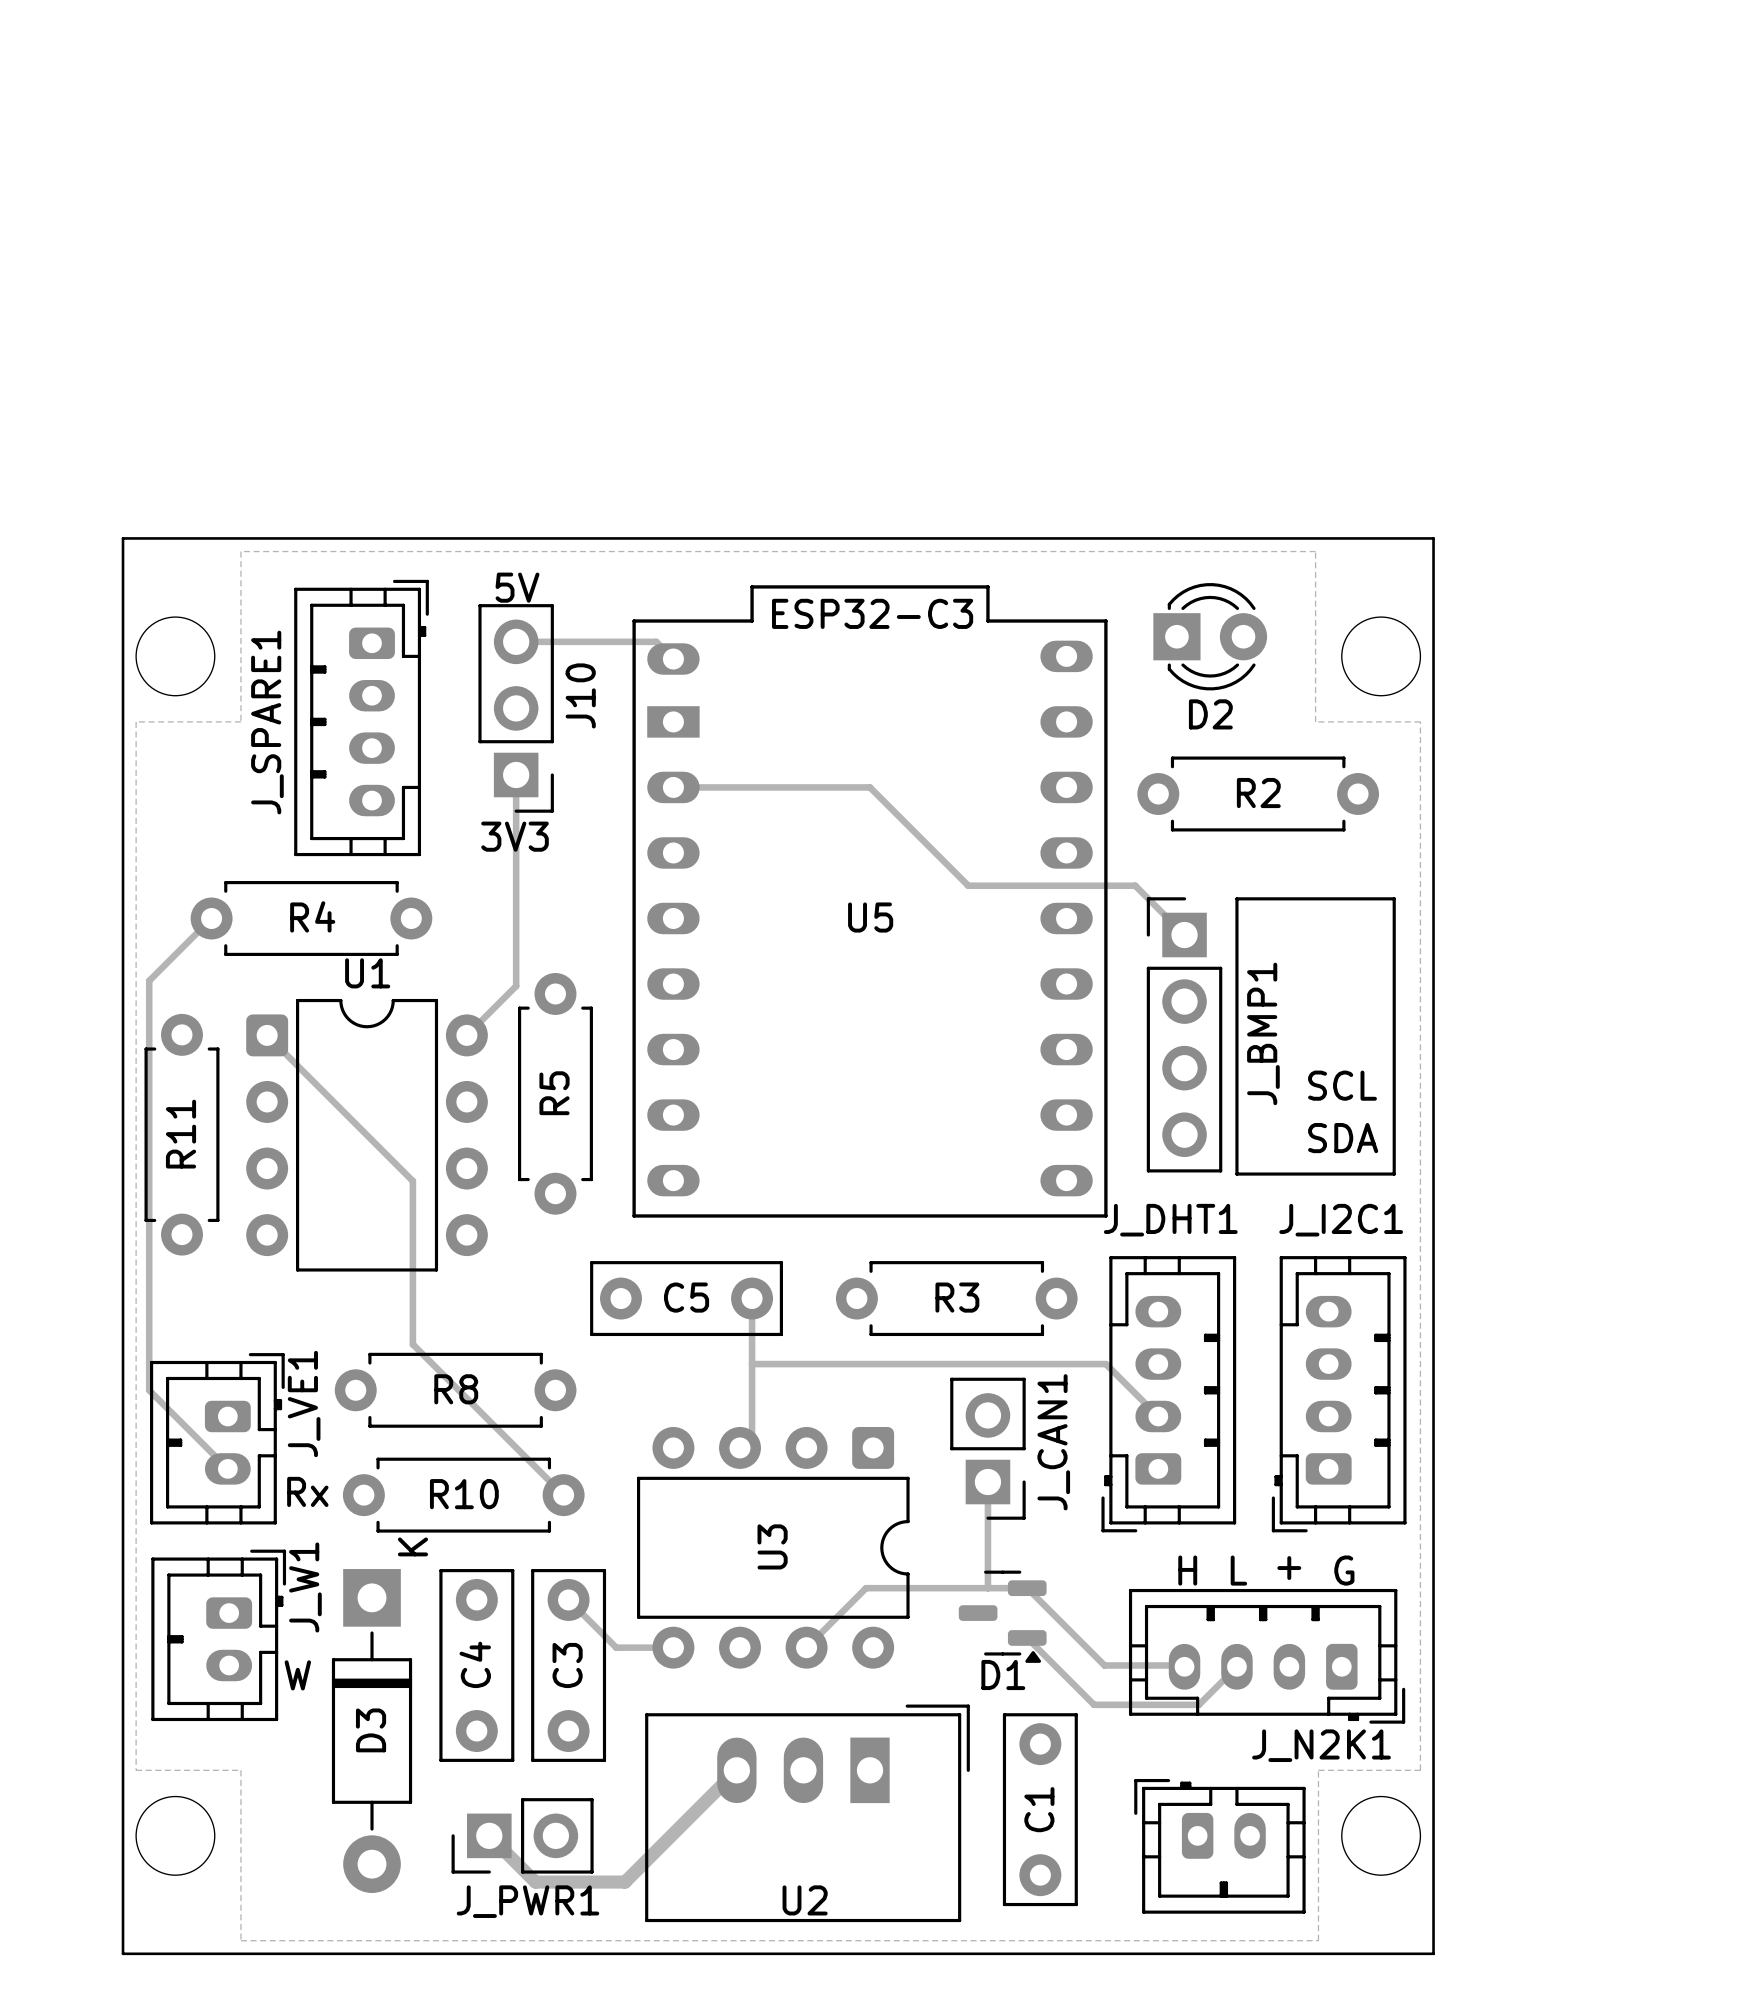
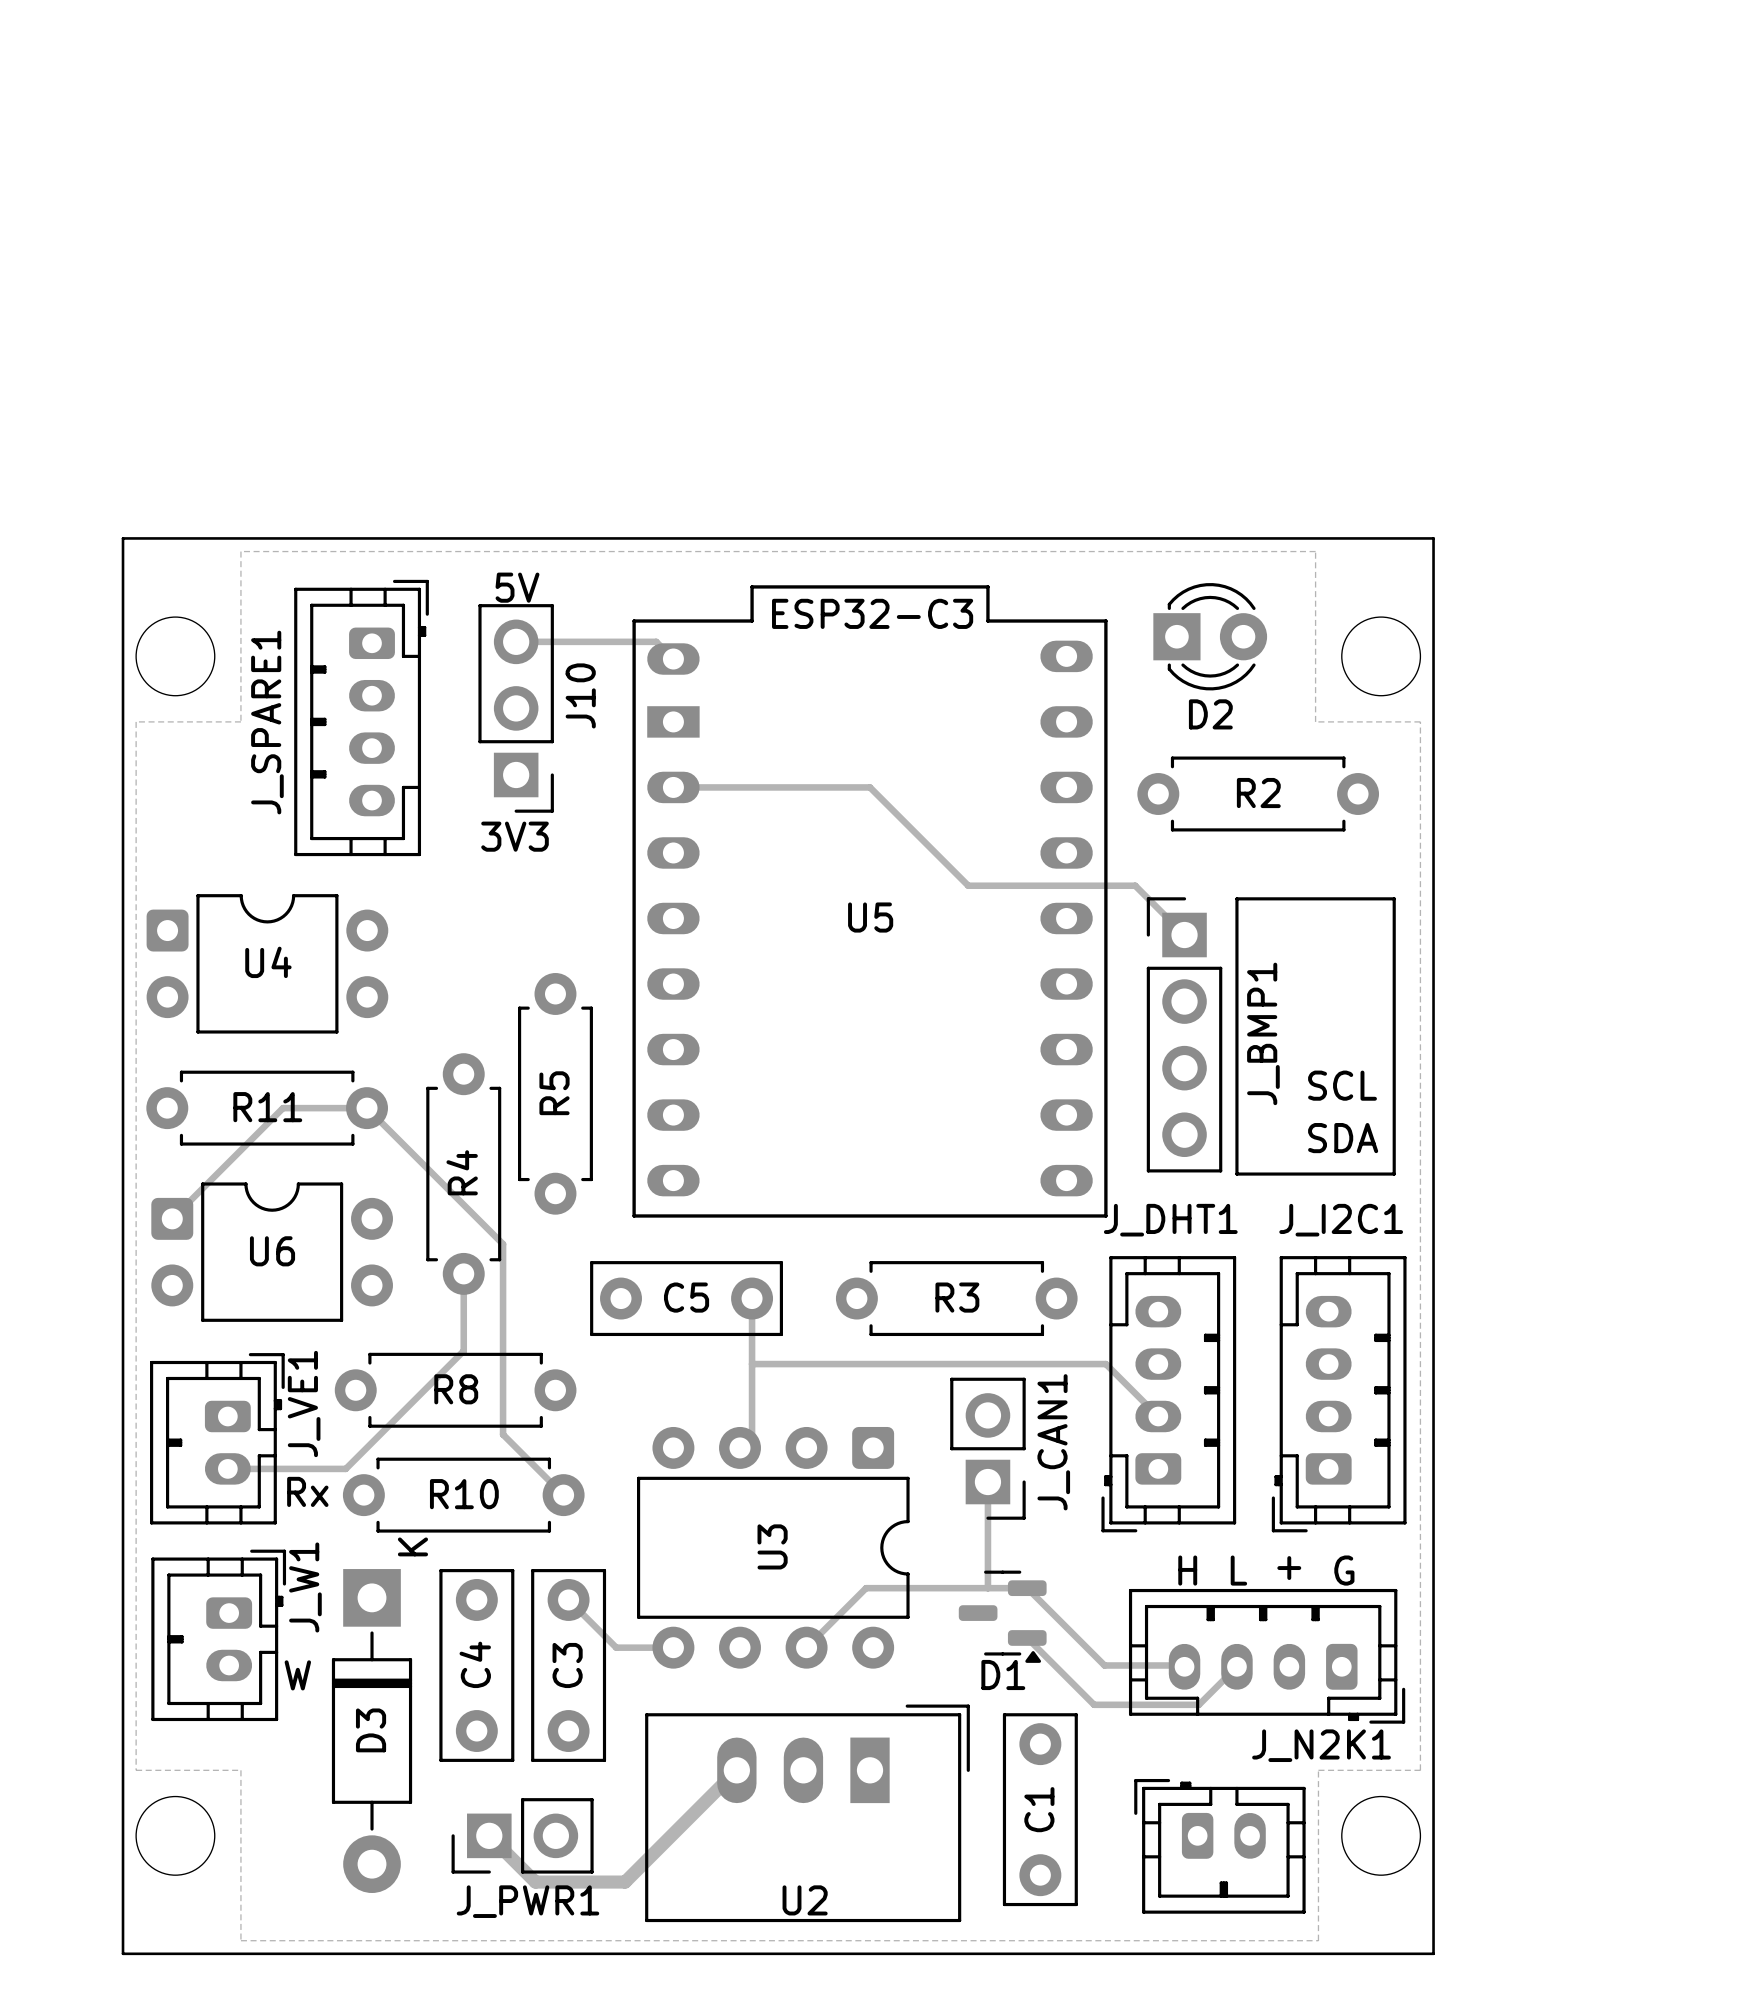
track: (516, 774) (516, 986) (466, 1035) -> none
track: (211, 918) (149, 980) (149, 1390) (227, 1468) -> (463, 1273) (463, 1350) (345, 1468) (227, 1468)
R4 rotation: 0° (311, 918) -> 90° clockwise (463, 1174)
R4 position: (311, 918) -> (463, 1174)
U4: none -> (267, 963)
track: (267, 1035) (412, 1181) (412, 1344) (503, 1434) -> (172, 1218) (283, 1108) (367, 1108) (503, 1244) (503, 1434)
R11 rotation: 0° (181, 1134) -> 90° clockwise (267, 1108)
U1: (367, 1135) -> none
U6: none -> (272, 1252)

